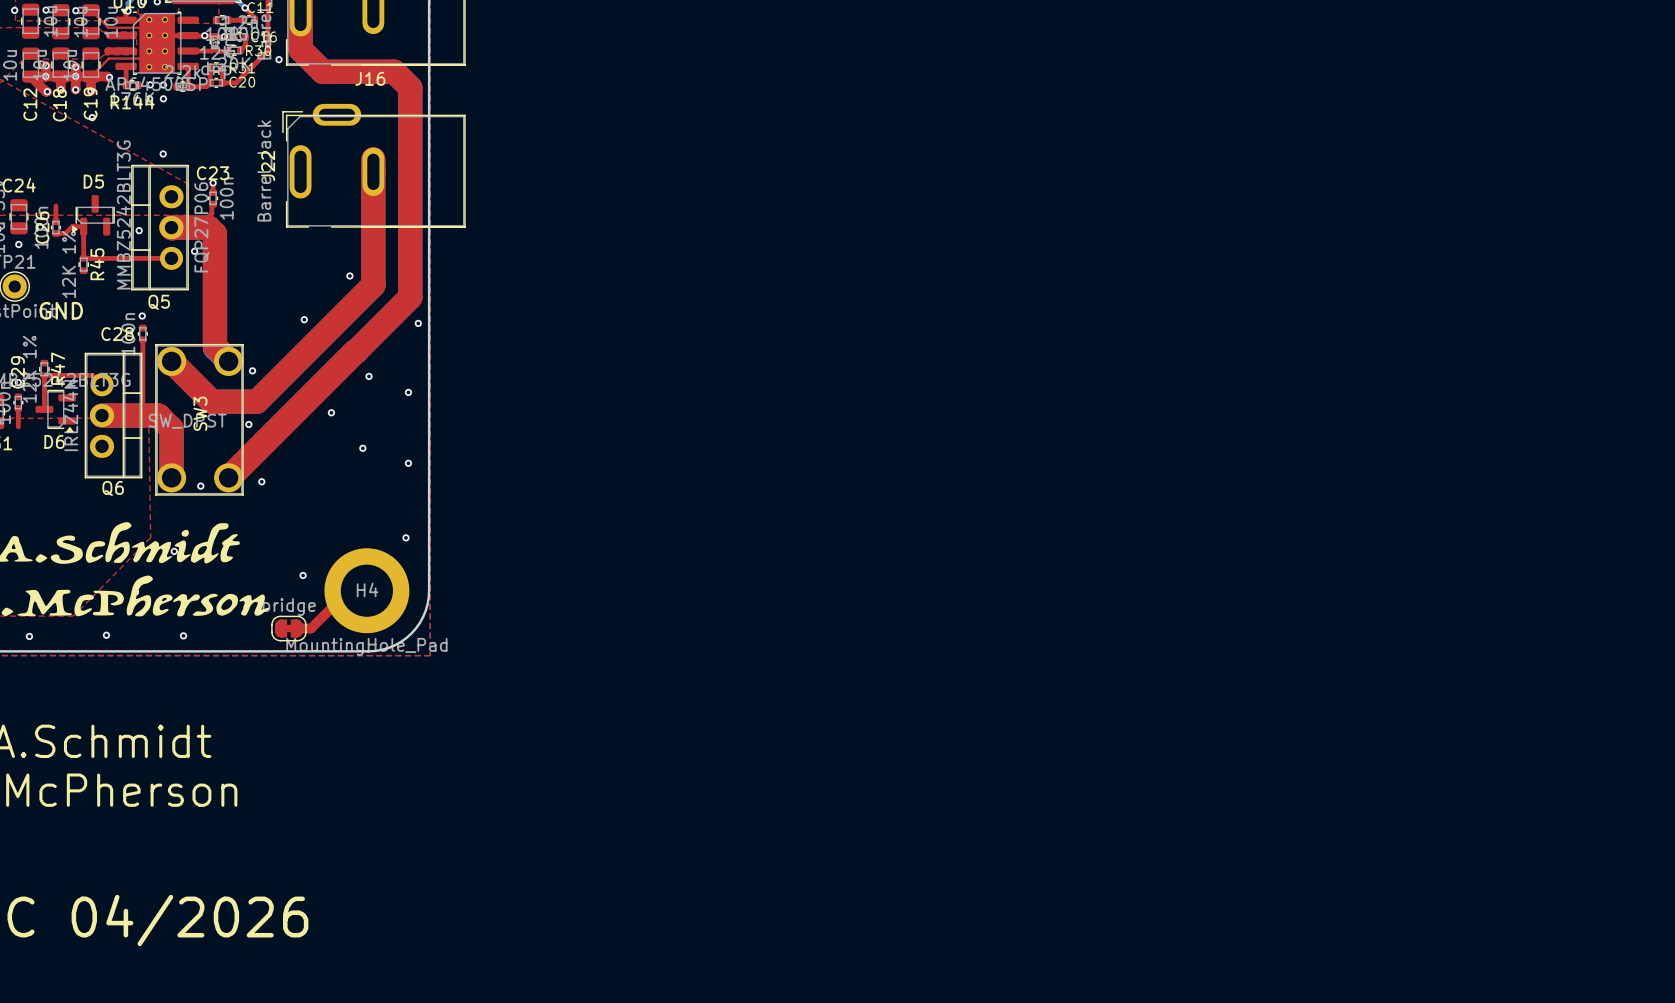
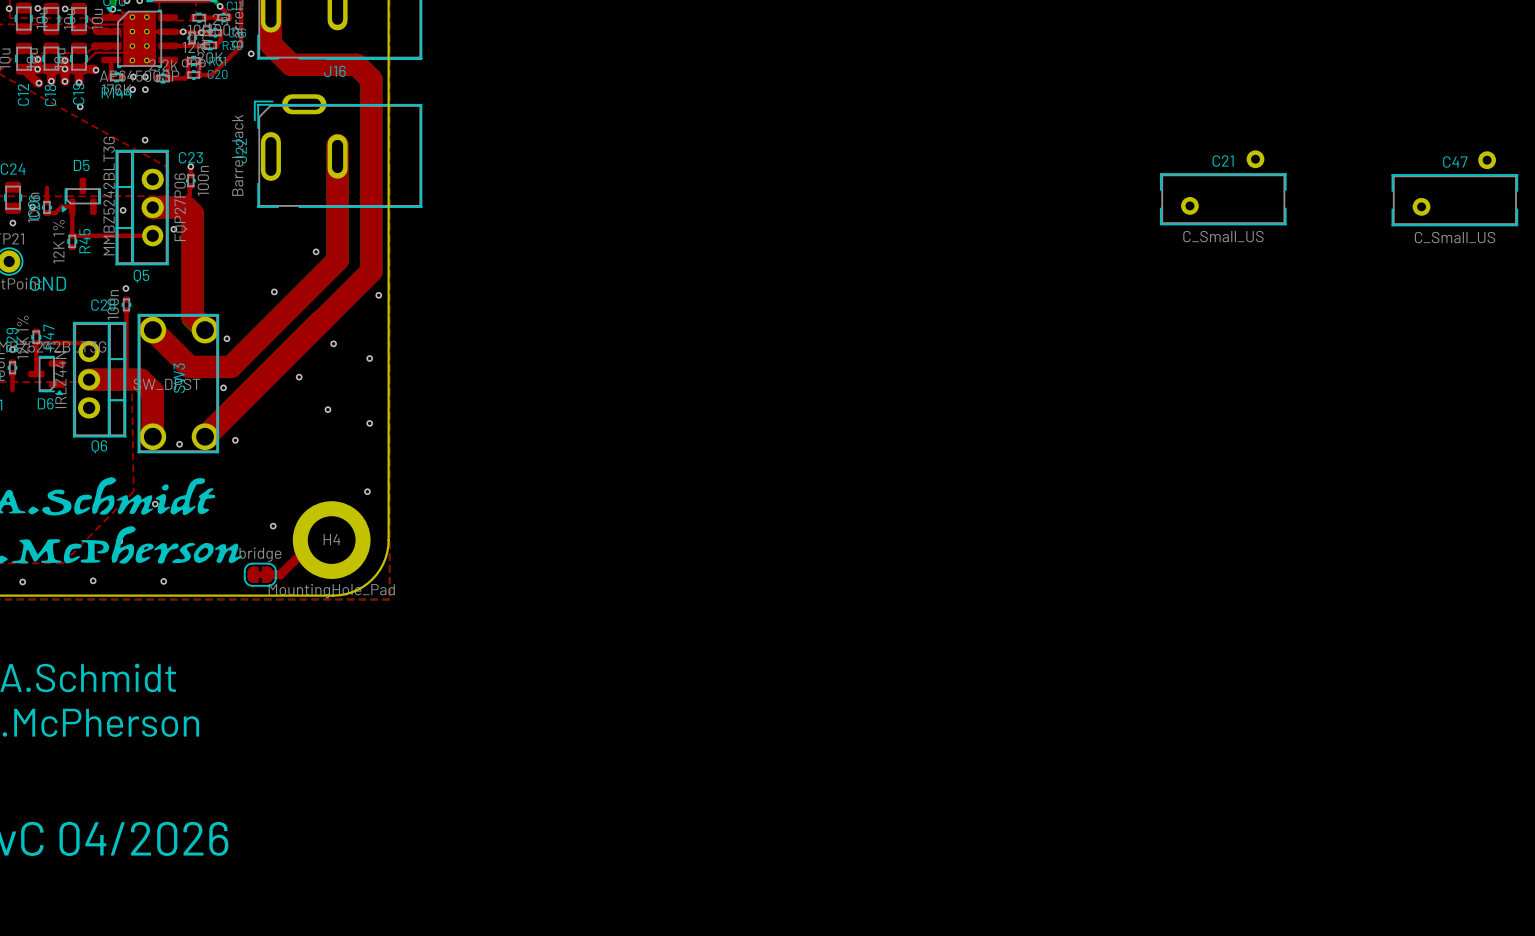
C21: none -> C_Small_US (1223, 187)
C47: none -> C_Small_US (1454, 188)

